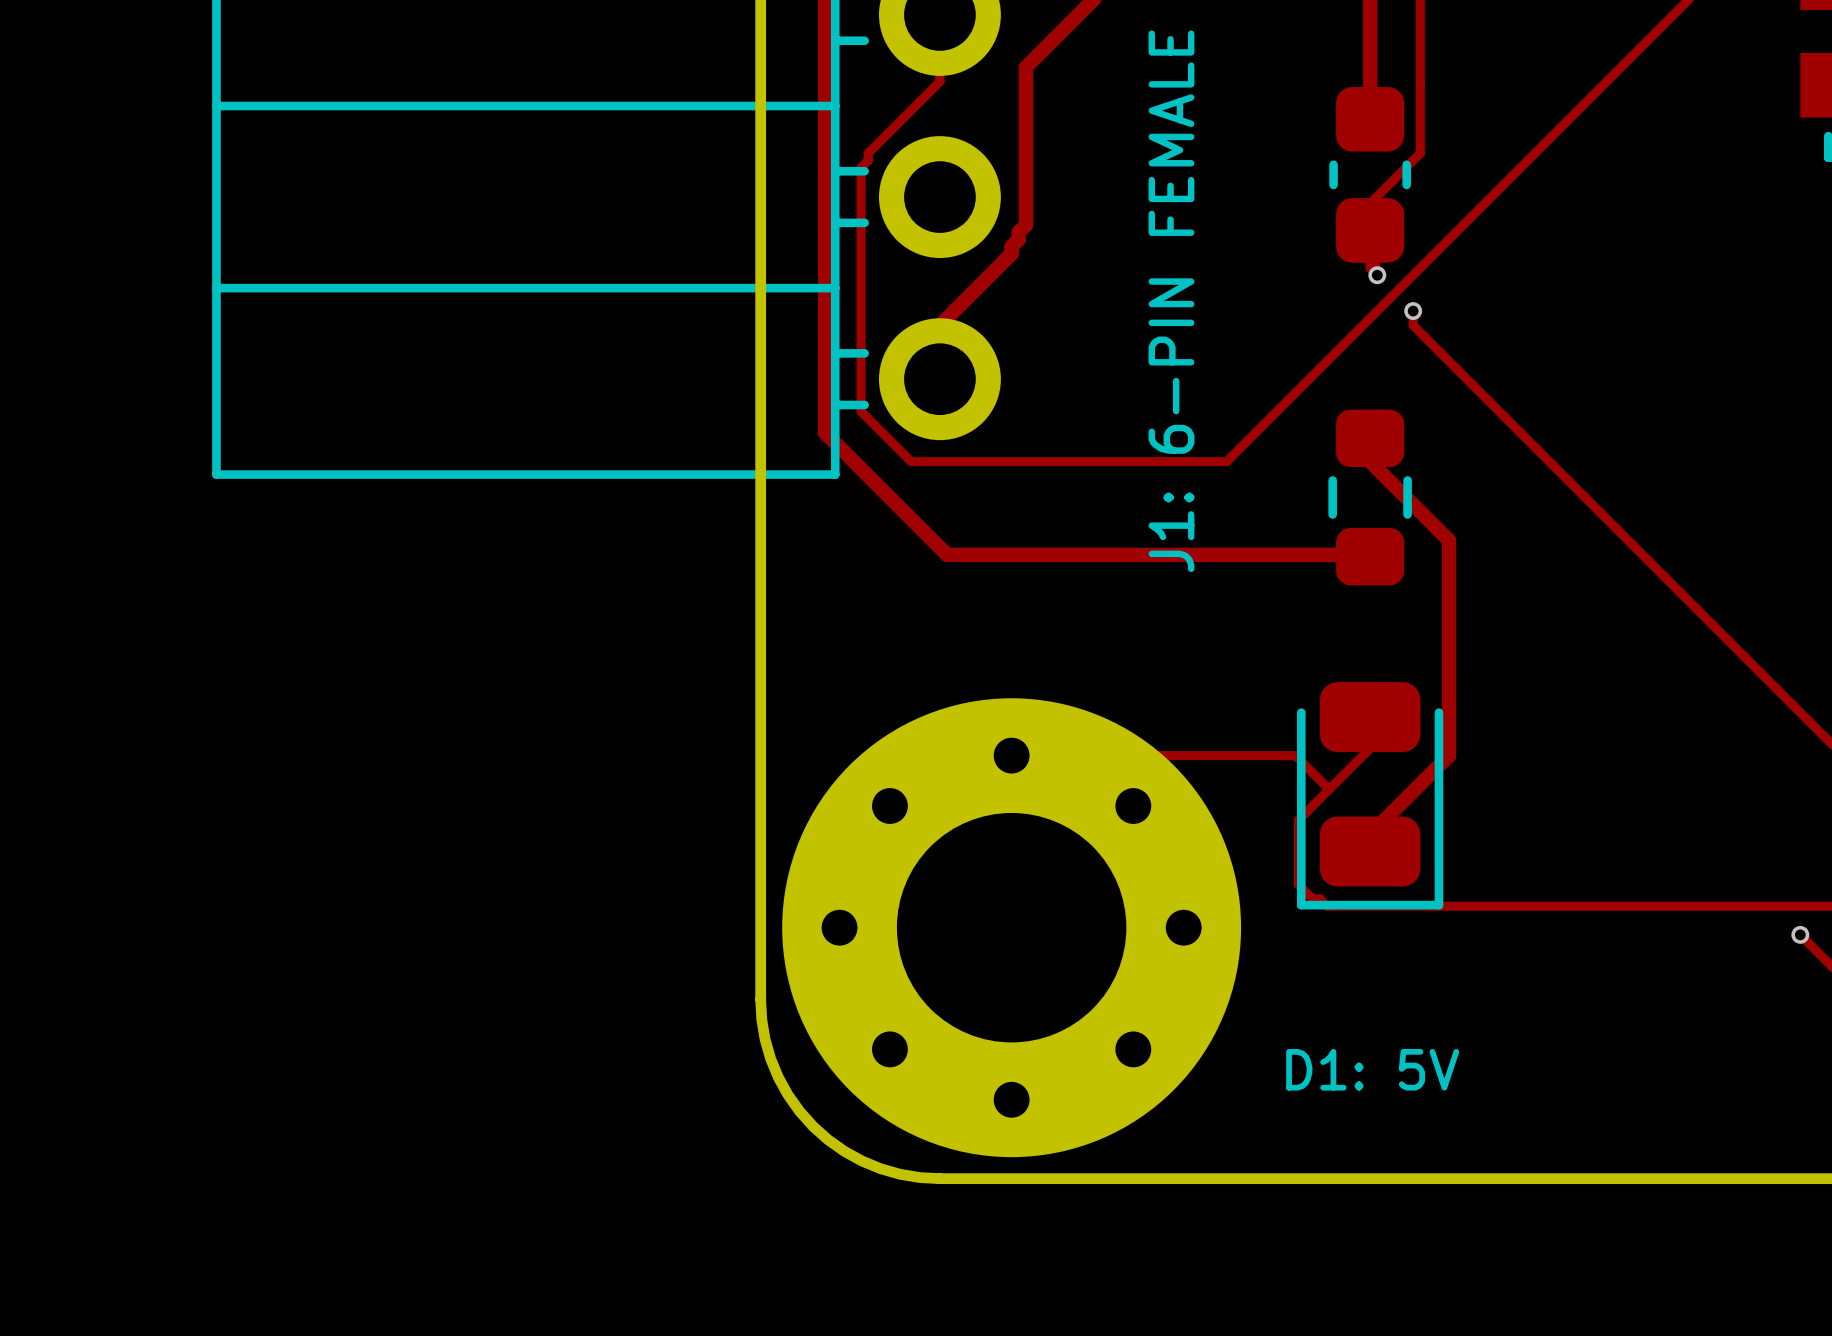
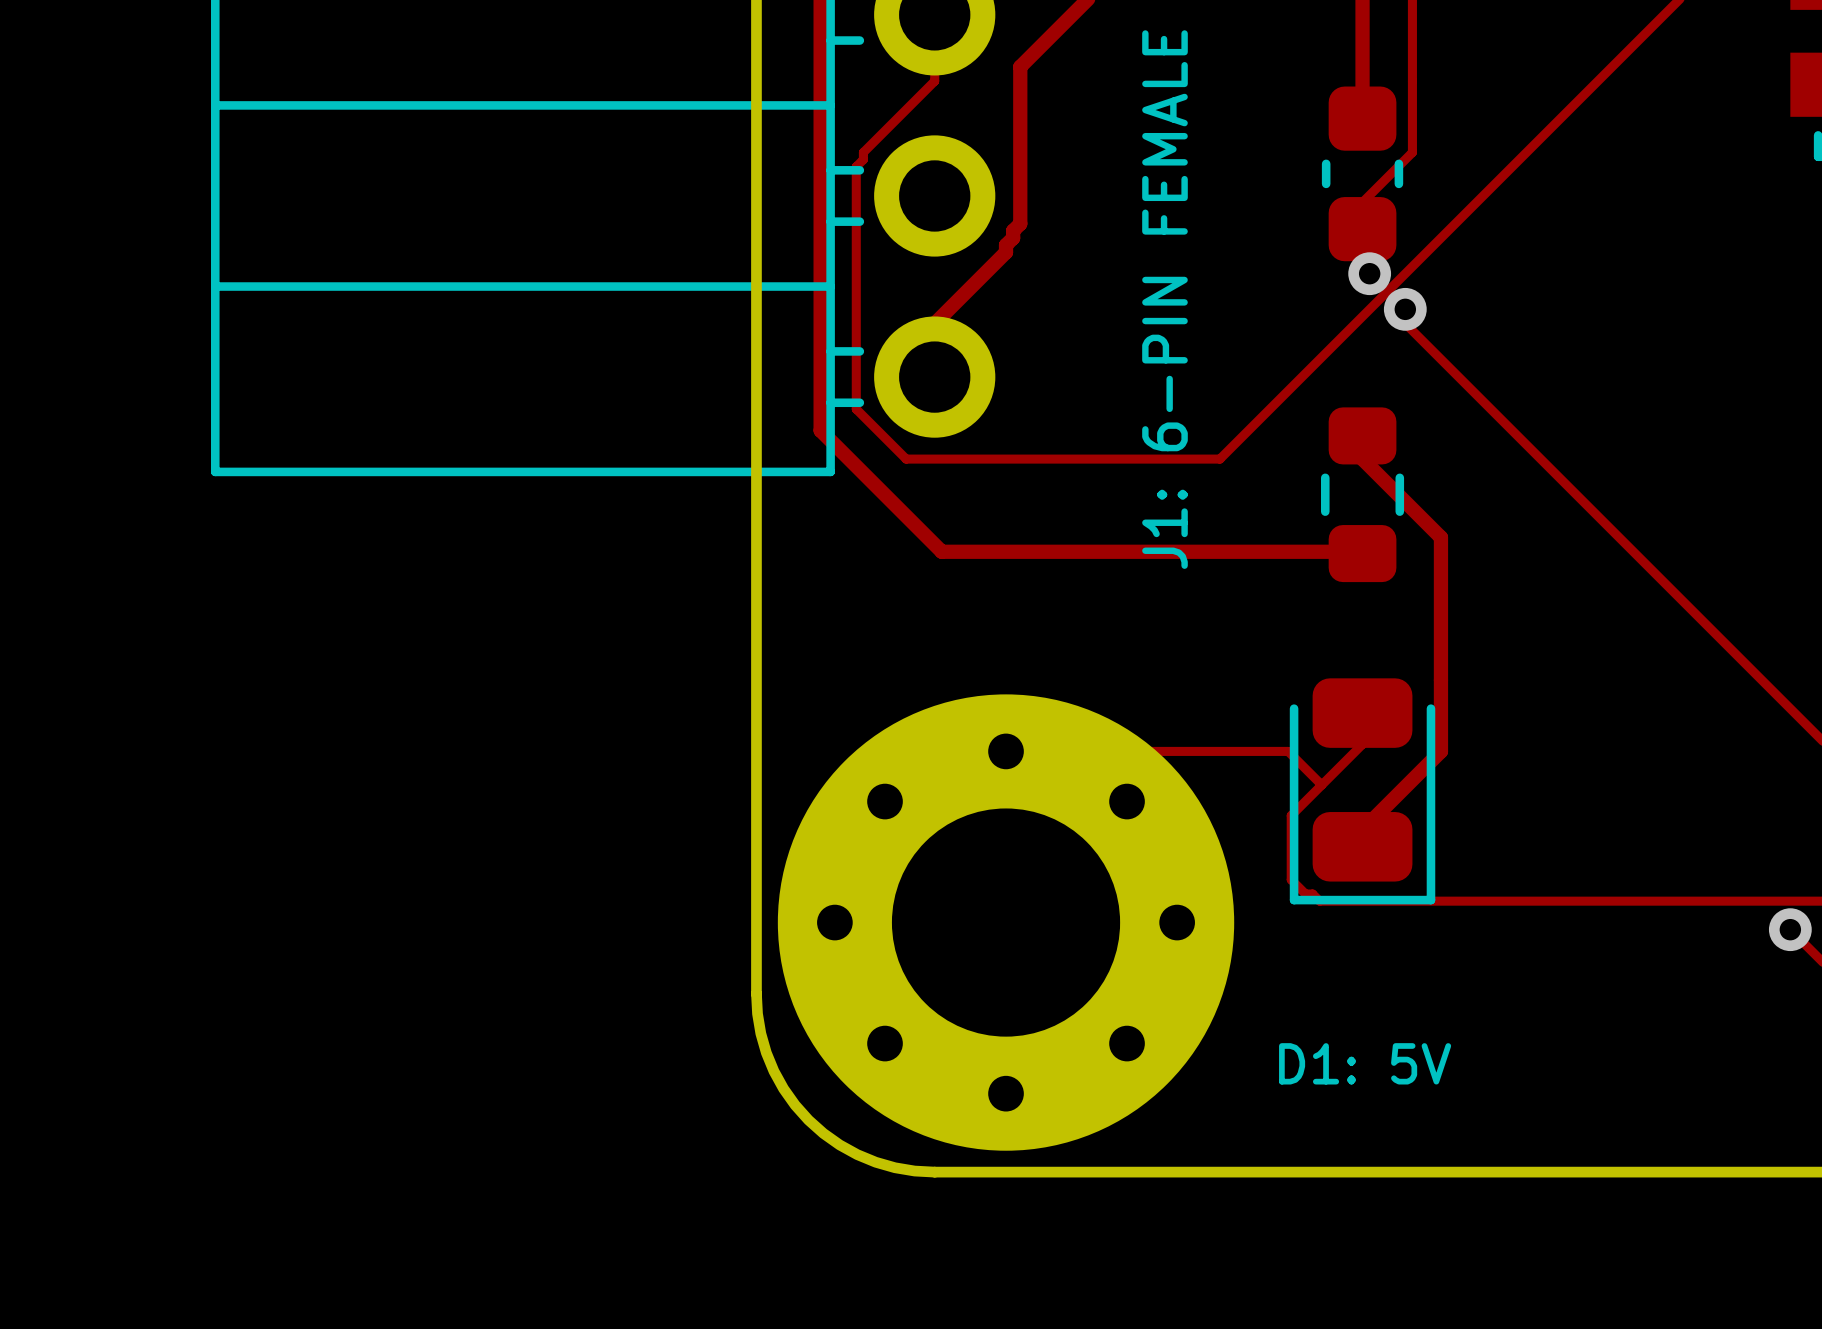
via size: [1368, 266, 1387, 285] -> [1348, 252, 1392, 296]
via size: [1404, 302, 1423, 321] -> [1383, 287, 1427, 331]
via size: [1791, 925, 1810, 944] -> [1768, 908, 1812, 952]

